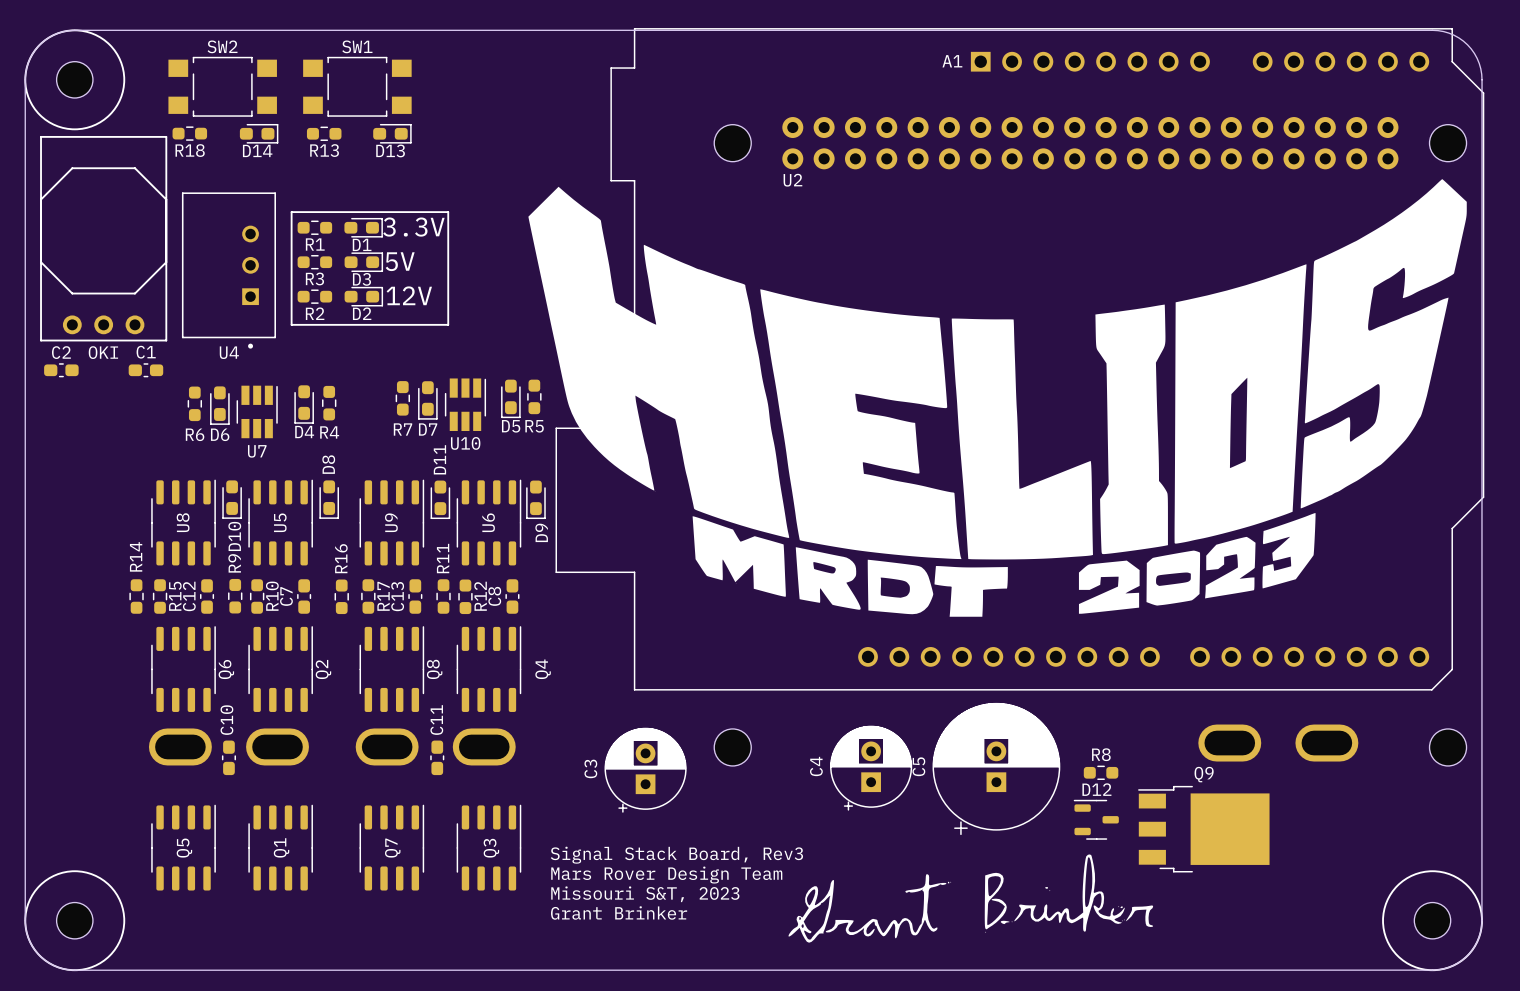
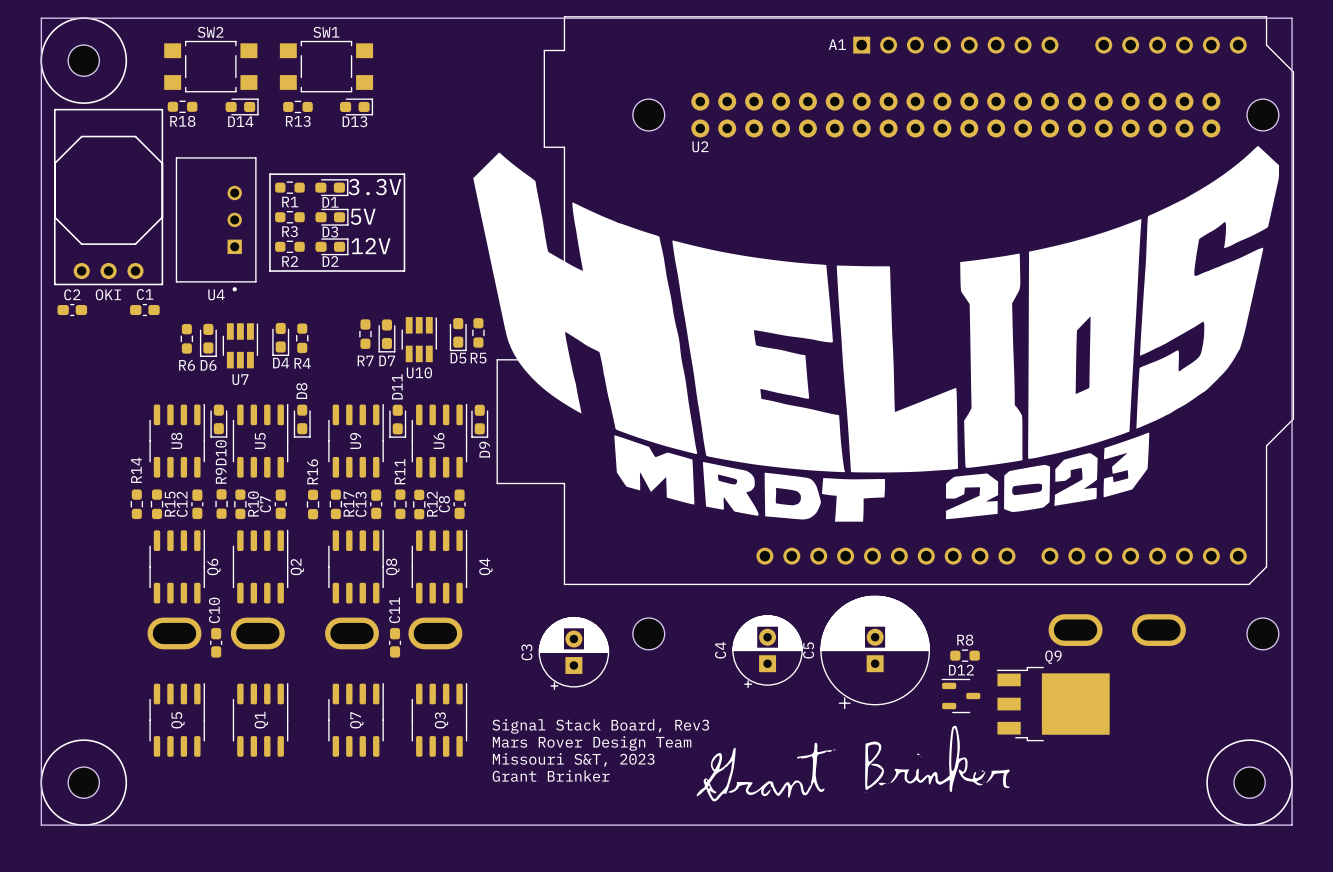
board edge: (74, 30) (1432, 30) (1443, 31) (1458, 37) (1467, 44) (1477, 58) (1482, 79) (1481, 920) (1480, 931) (1474, 946) (1467, 955) (1453, 965) (1432, 970) (74, 970) (58, 967) (48, 962) (39, 955) (30, 942) (25, 920) (25, 79) (30, 58) (39, 44) (53, 35) (74, 30) -> (41, 18) (41, 825) (1292, 825) (1292, 18) (41, 18)

